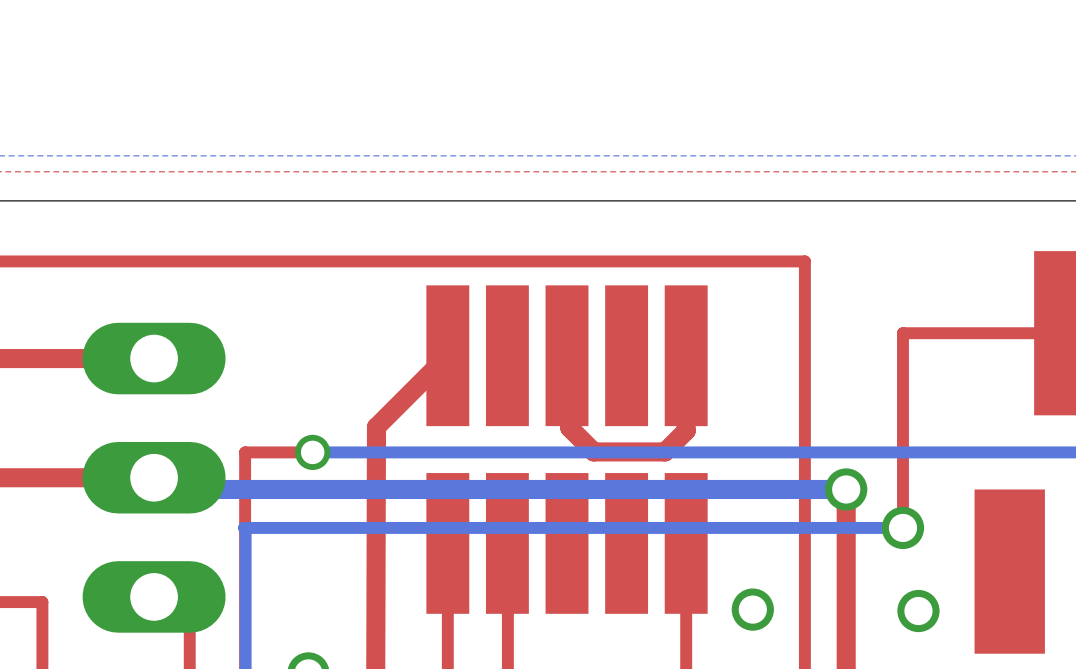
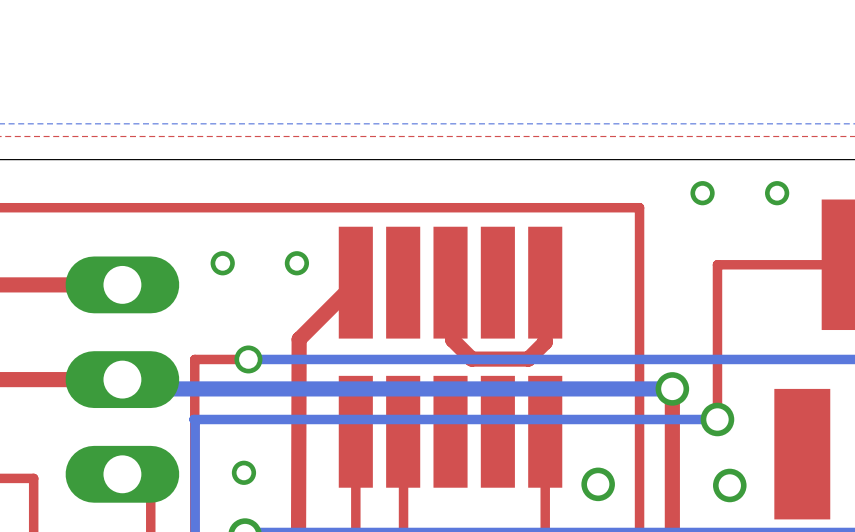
via: none -> (702, 193)
via: none -> (777, 193)
via: none -> (222, 263)
via: none -> (296, 263)
via: none -> (243, 472)

